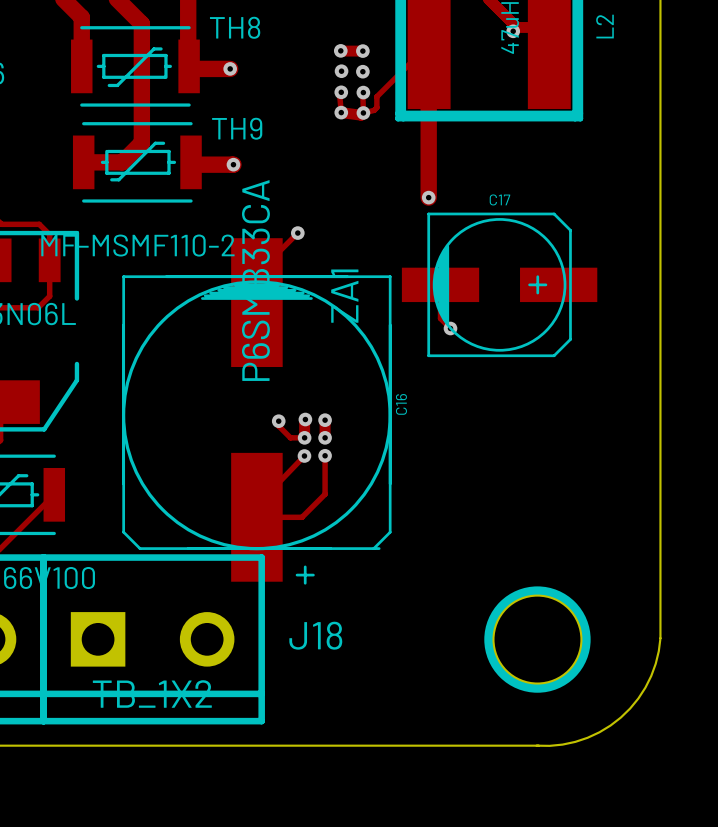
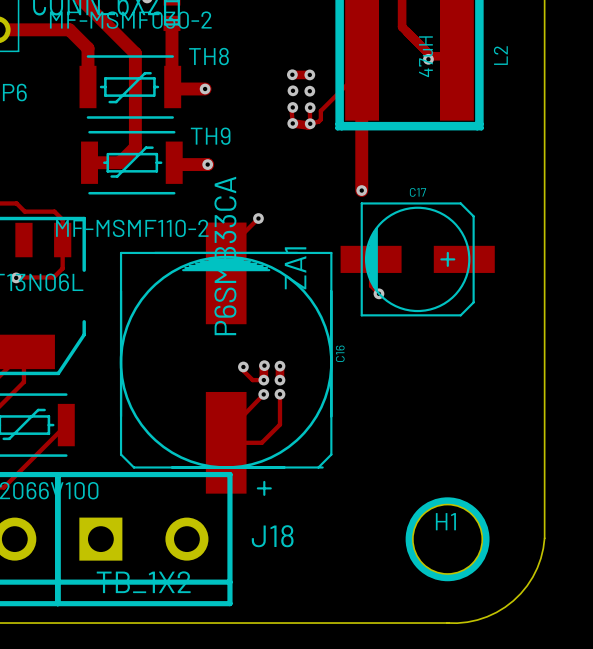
H1 name: none -> H1 (445, 521)

